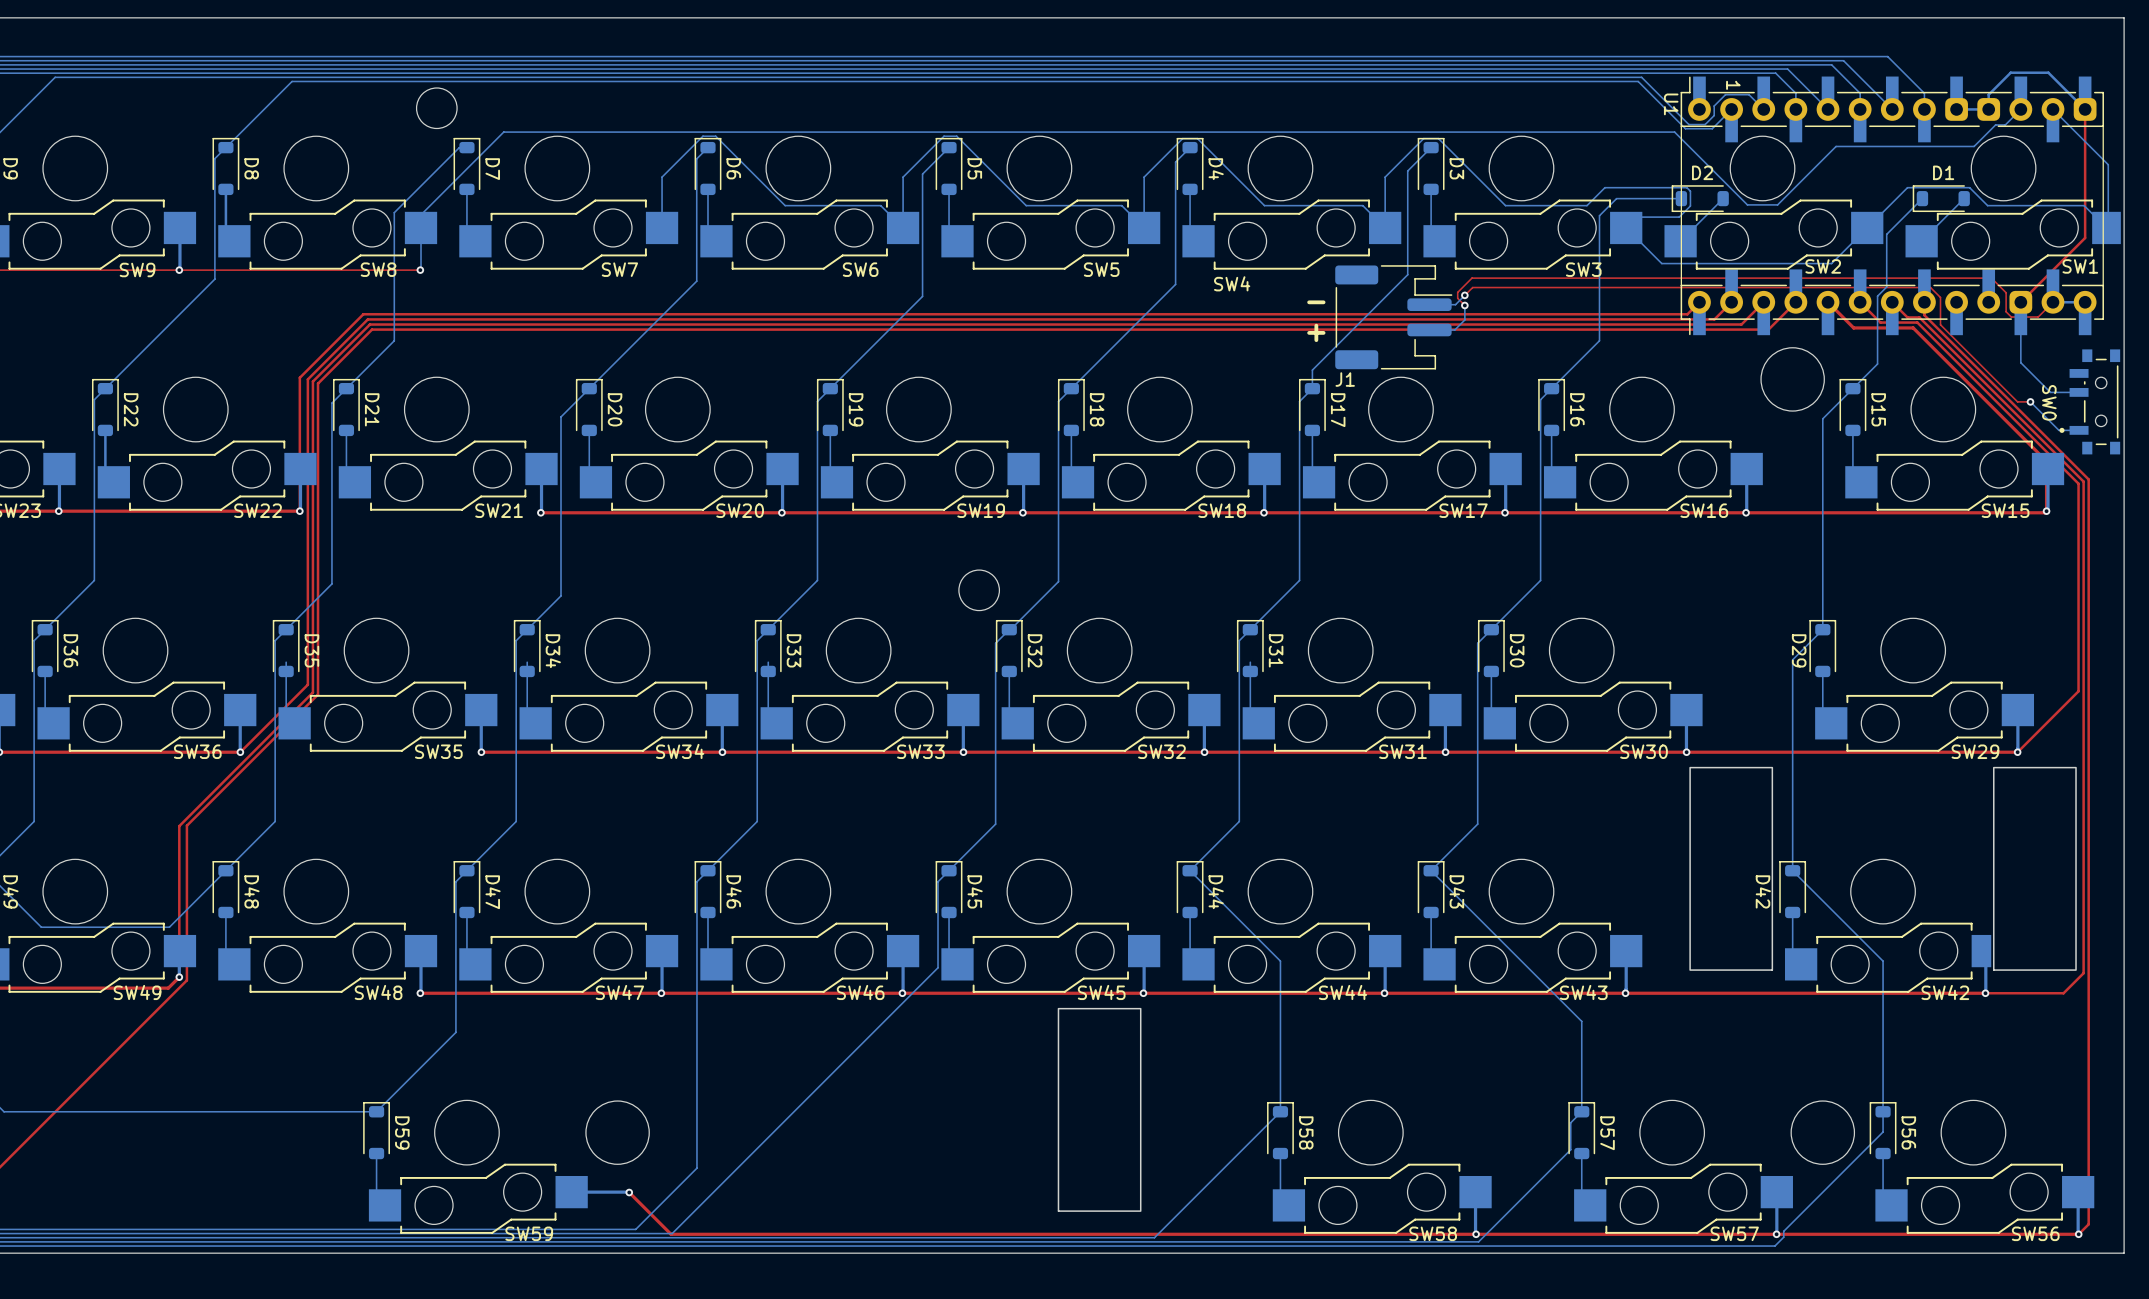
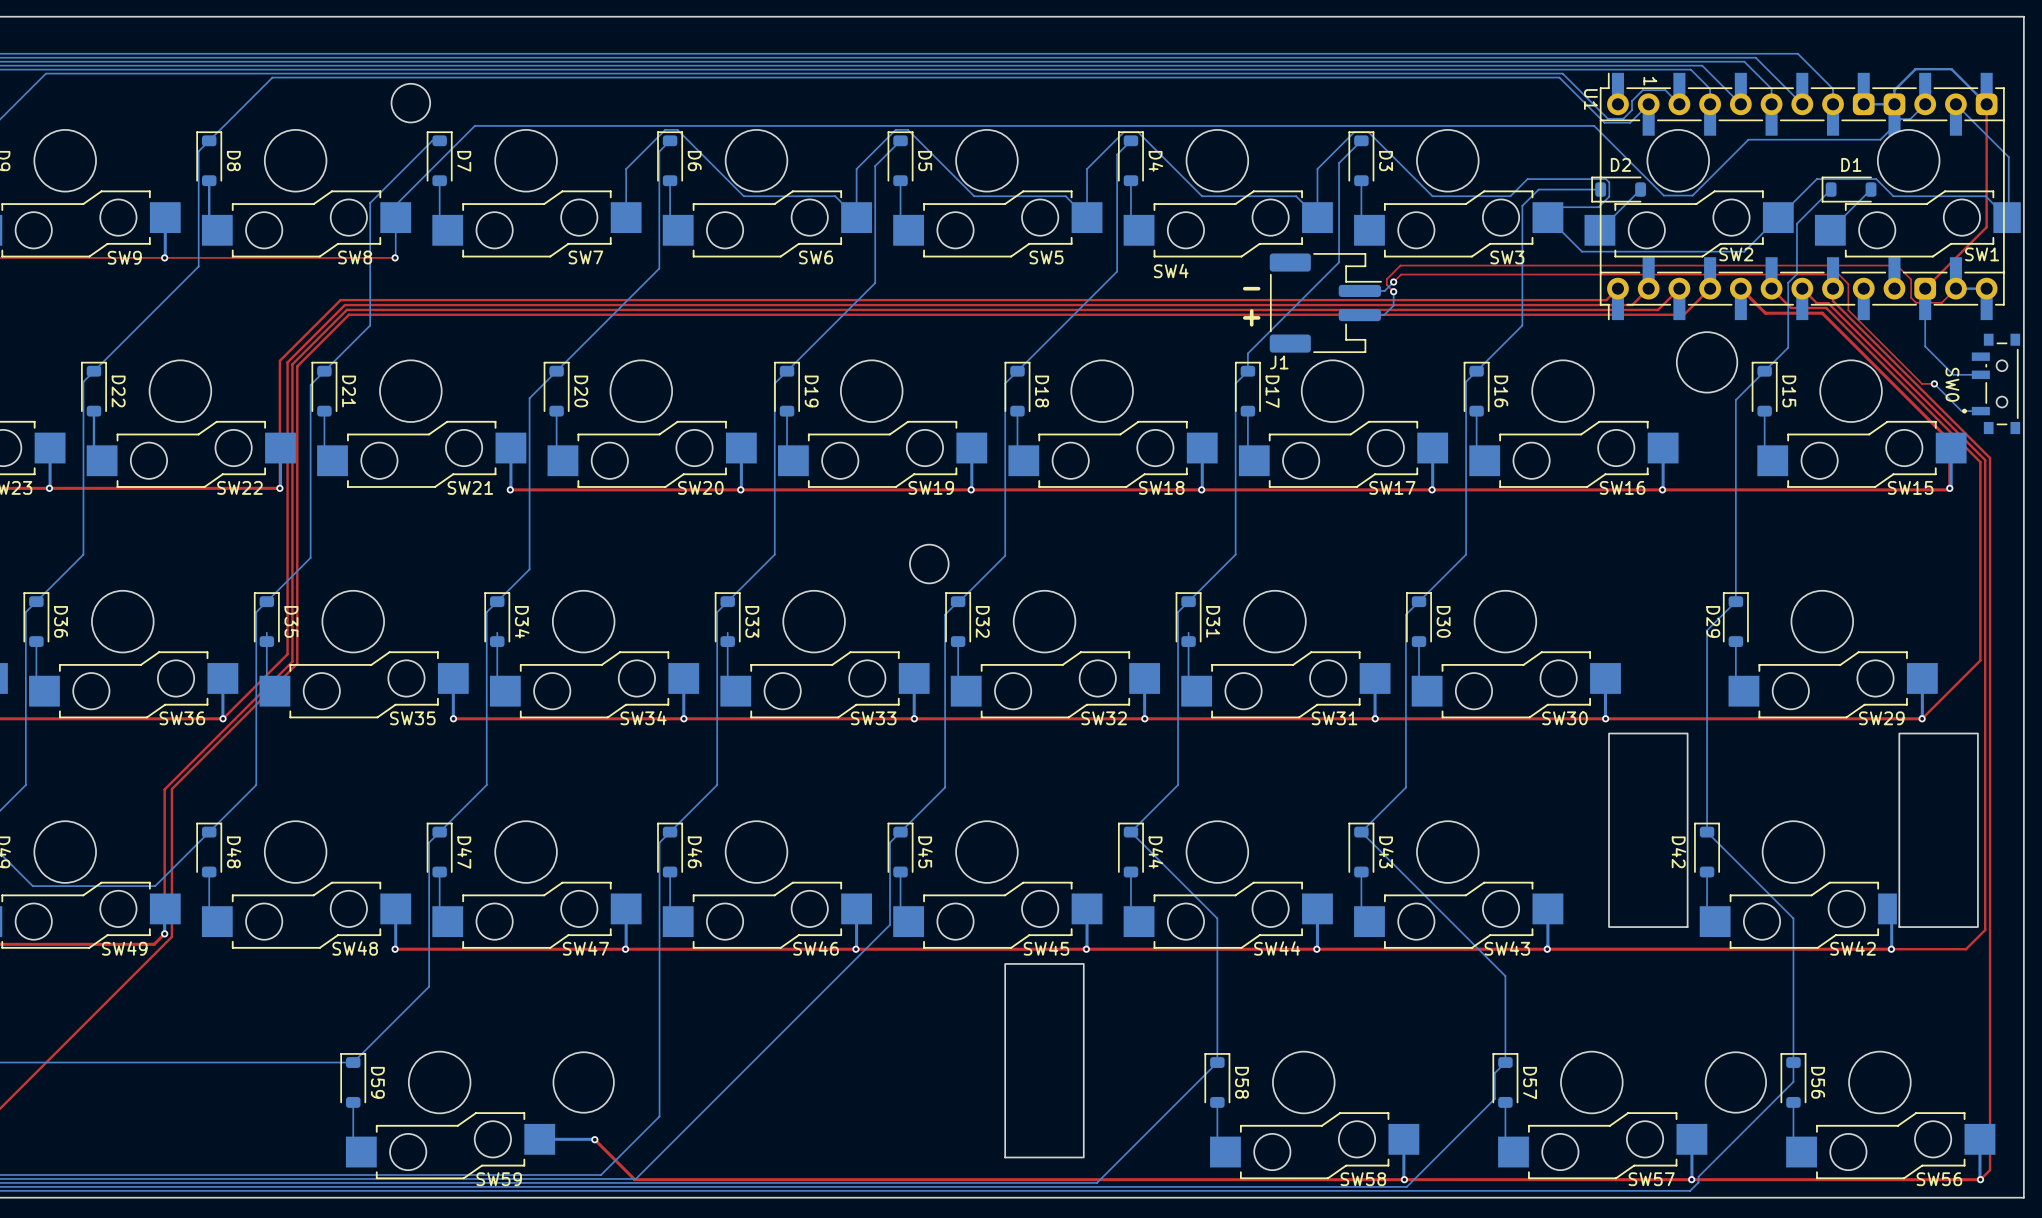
U1 footprint: [1680, 76, 2104, 336] -> [1599, 72, 2005, 321]

